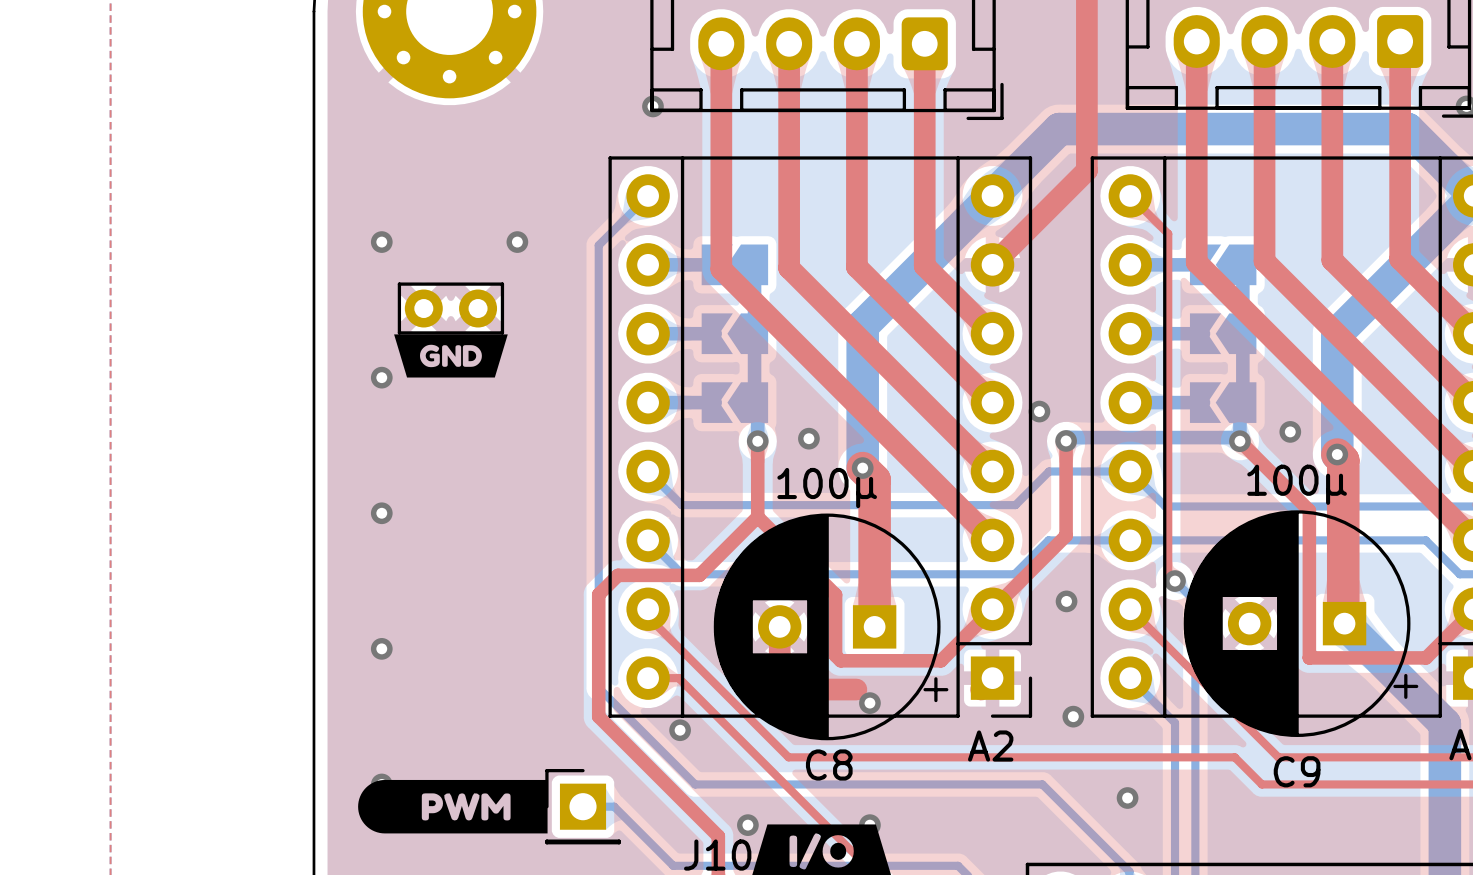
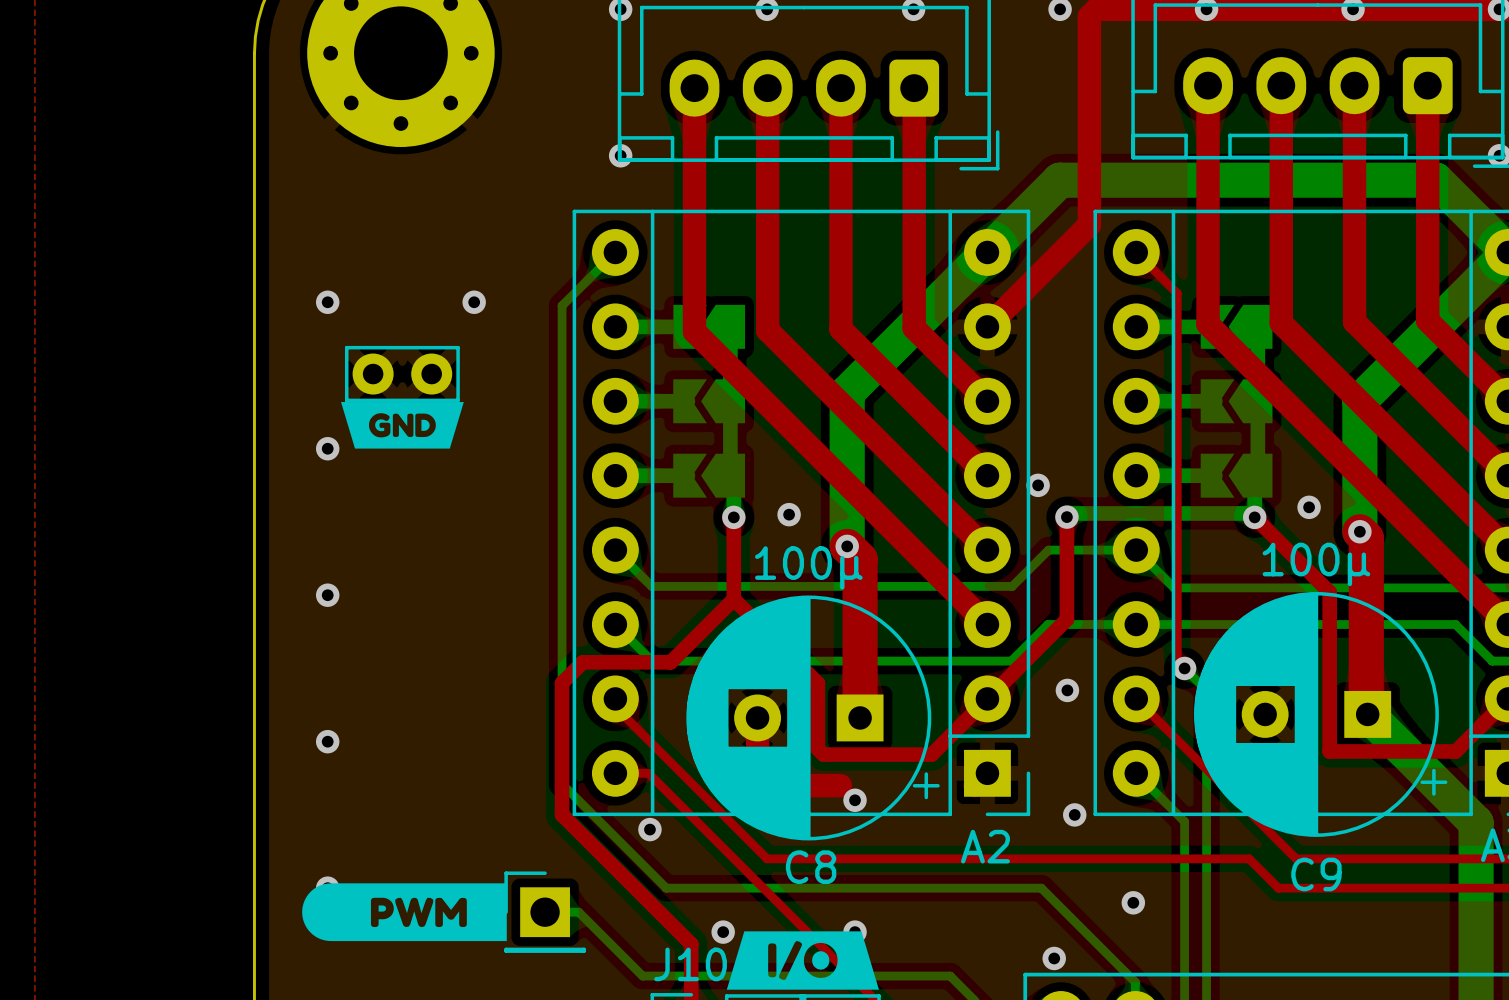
via: none -> (1054, 958)

